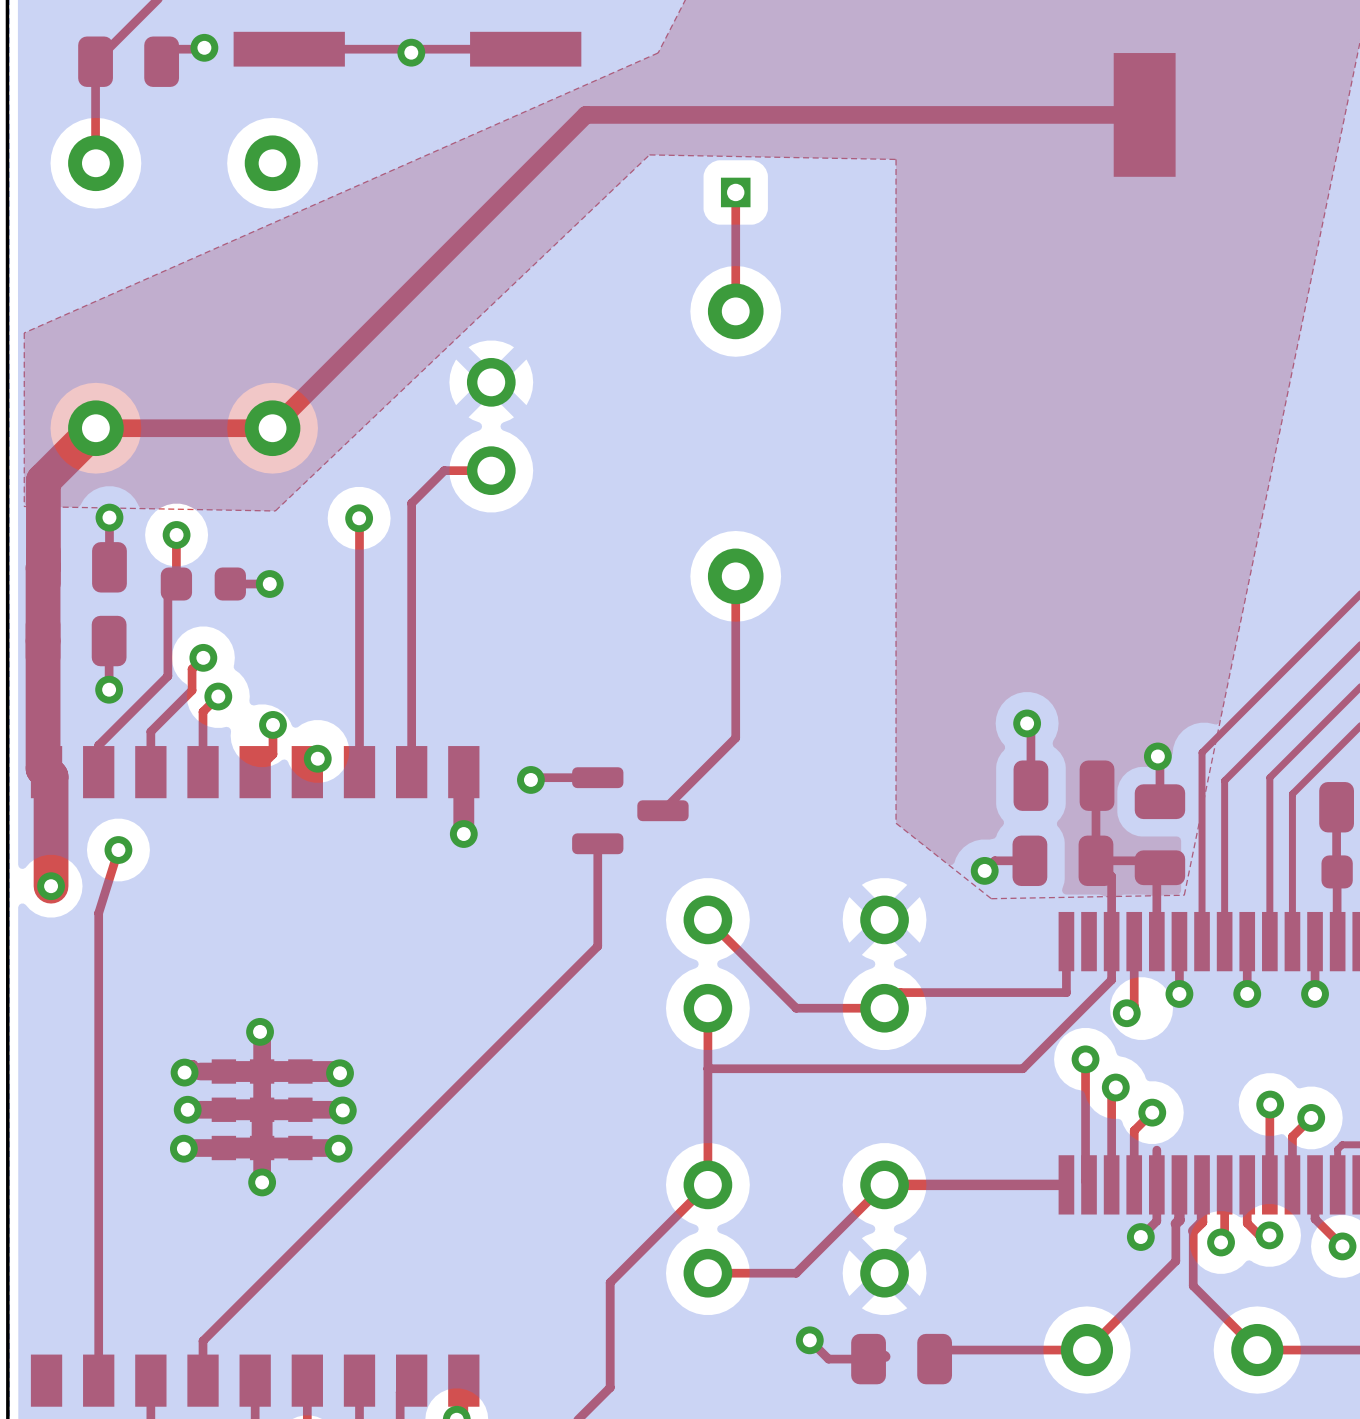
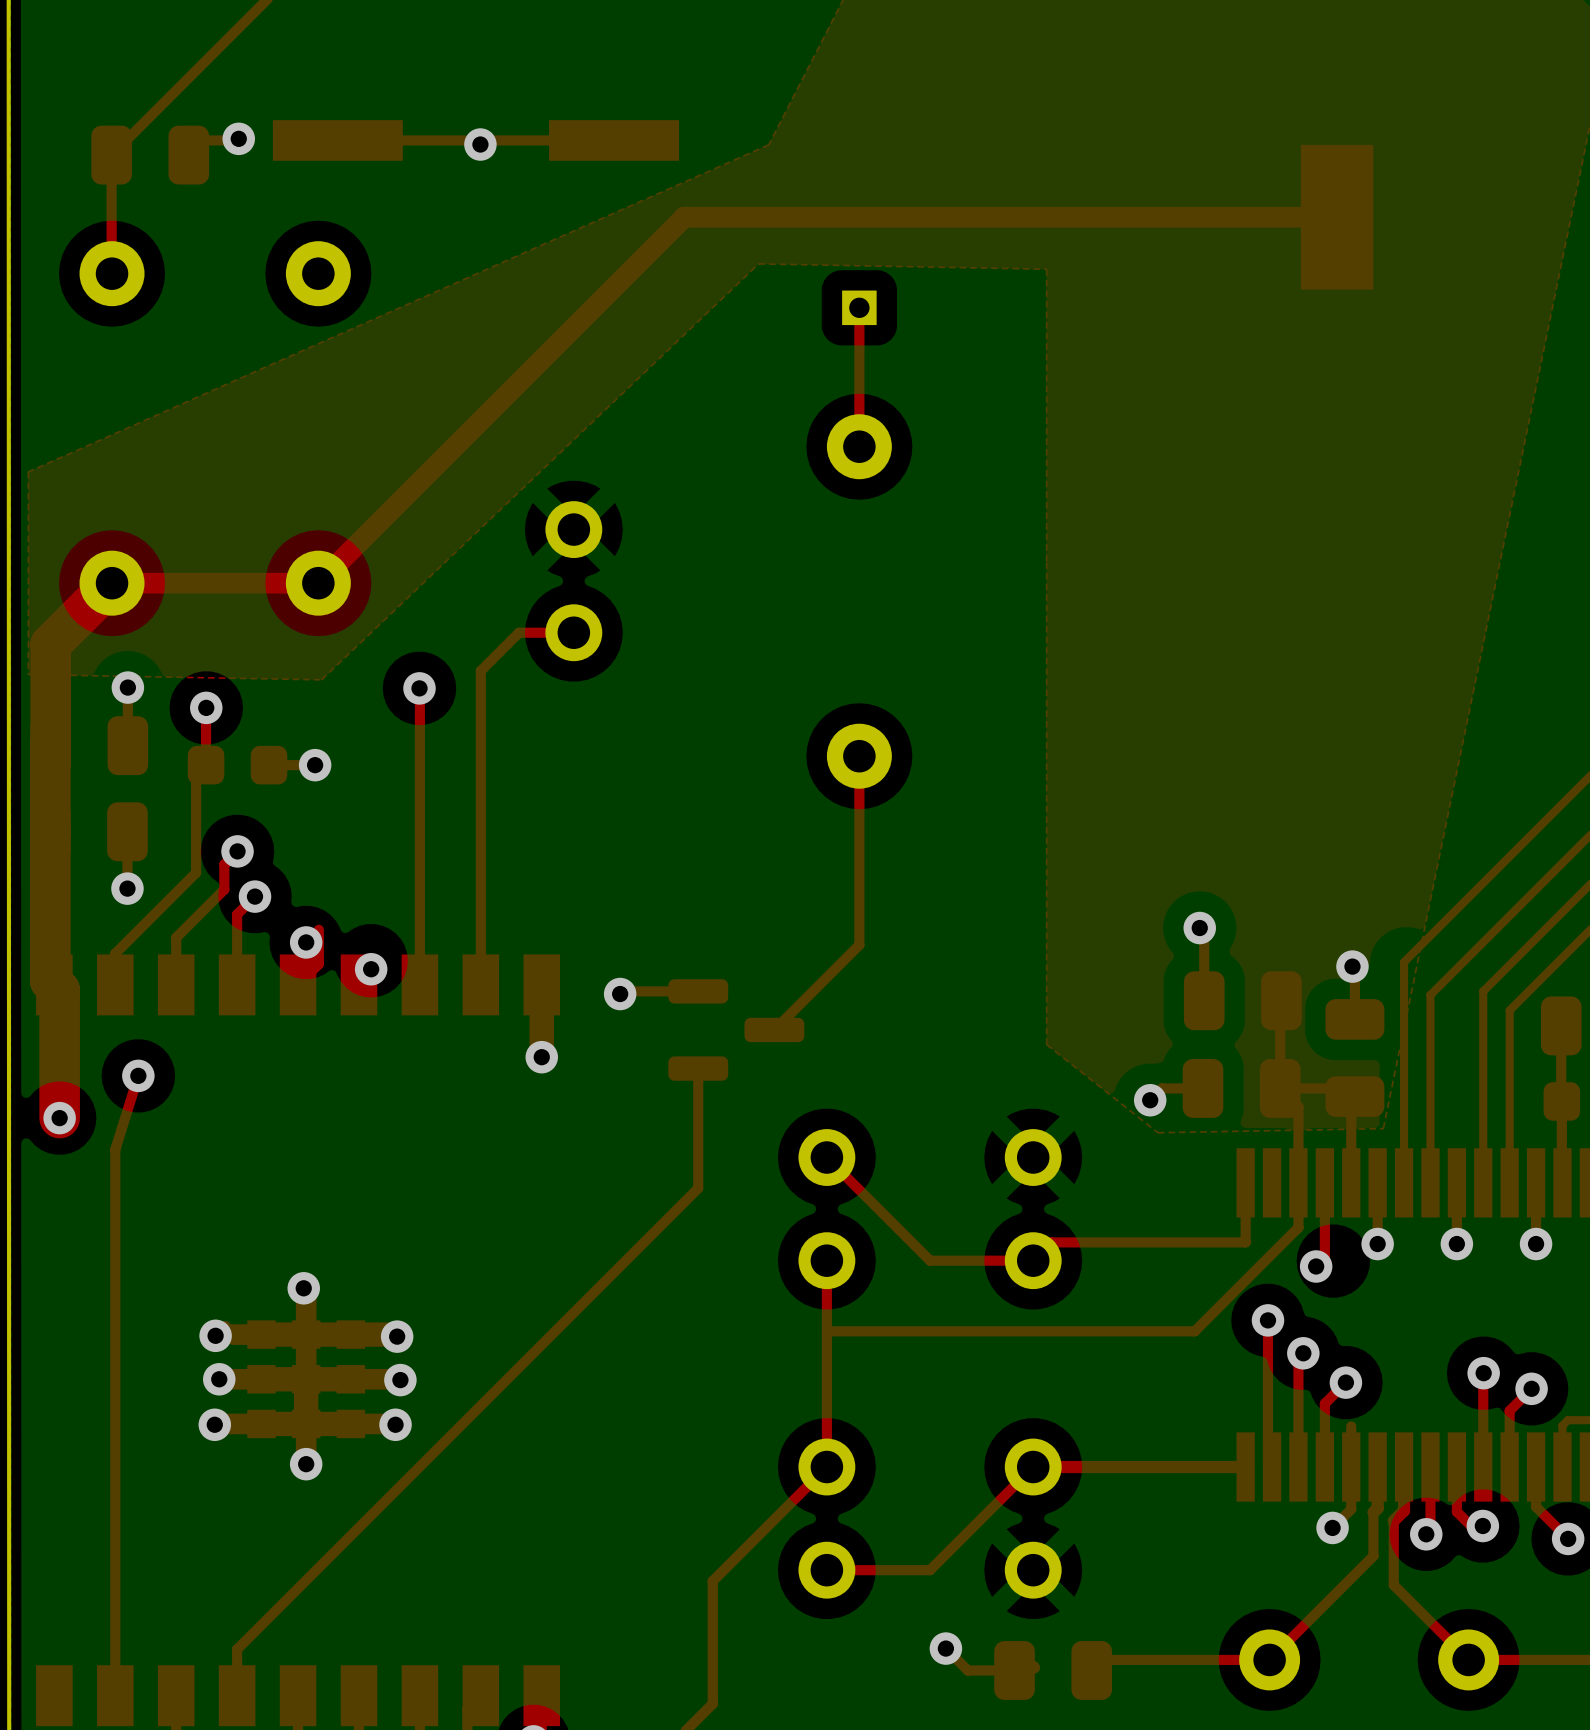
via position: (272, 724) -> (306, 942)

